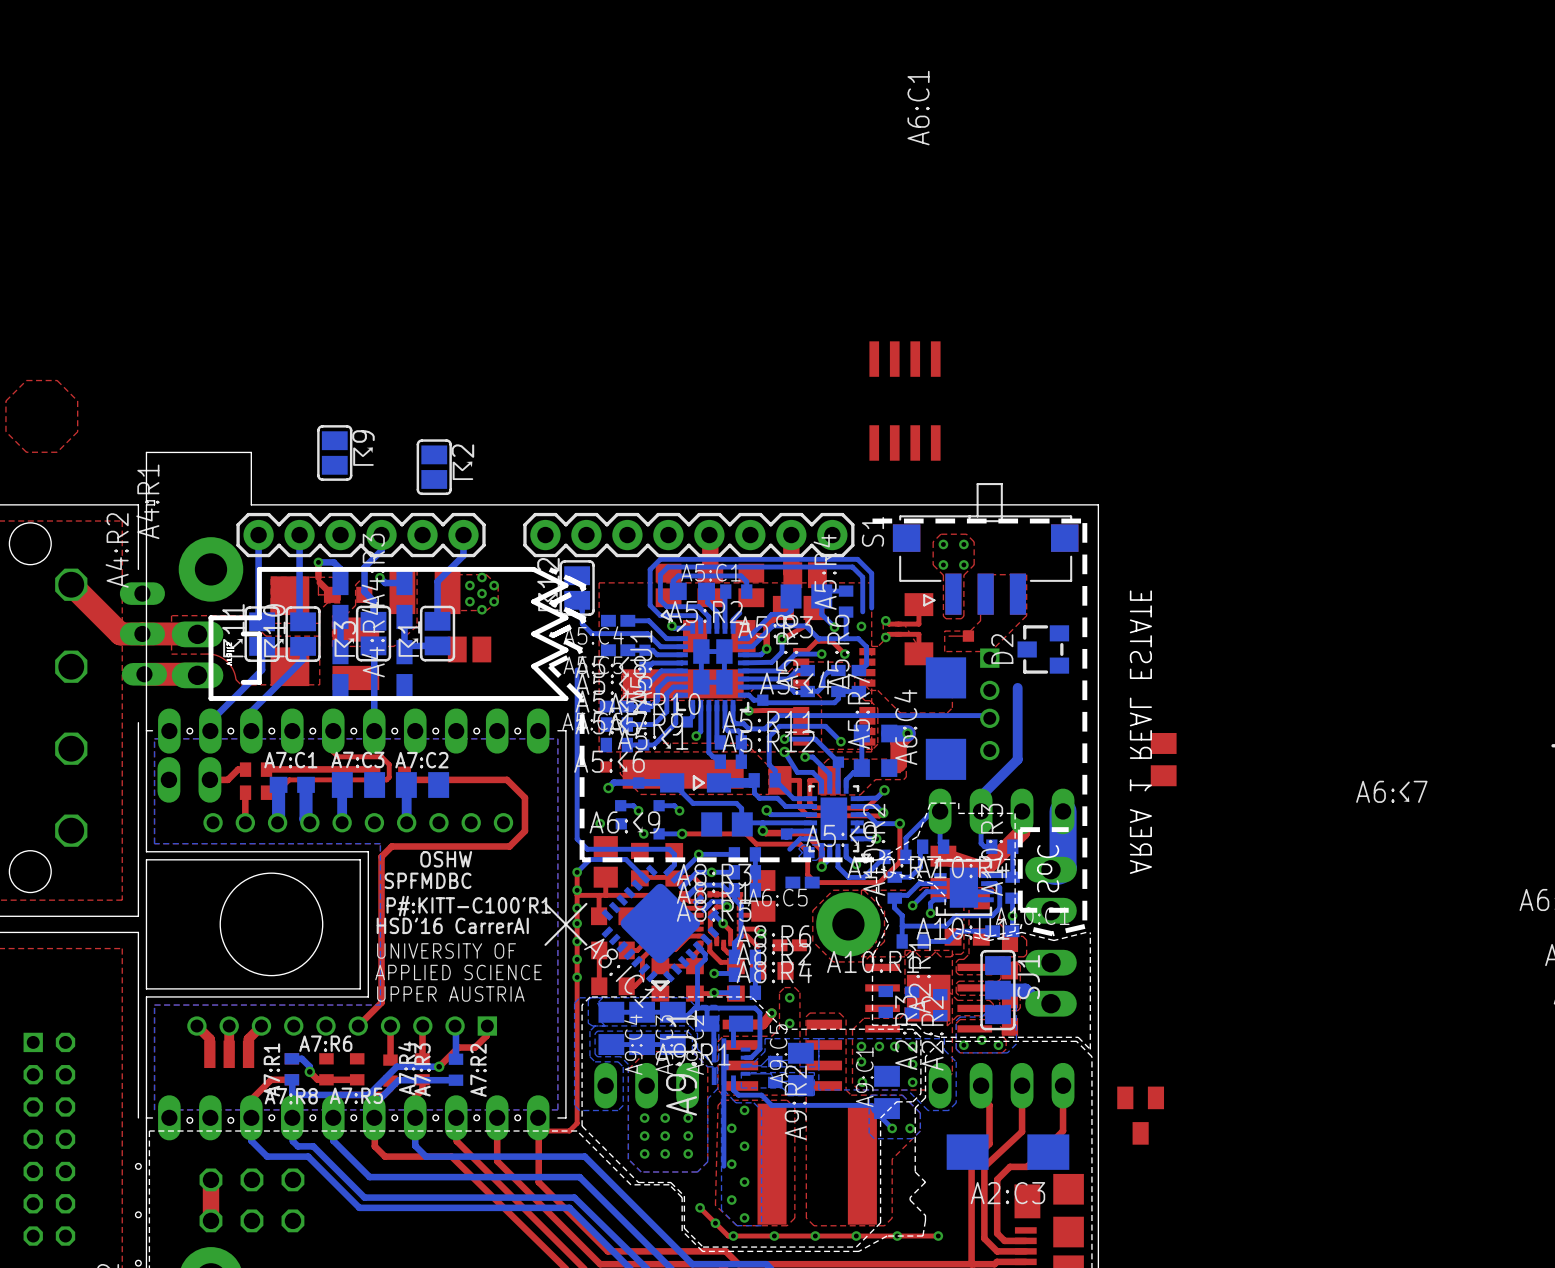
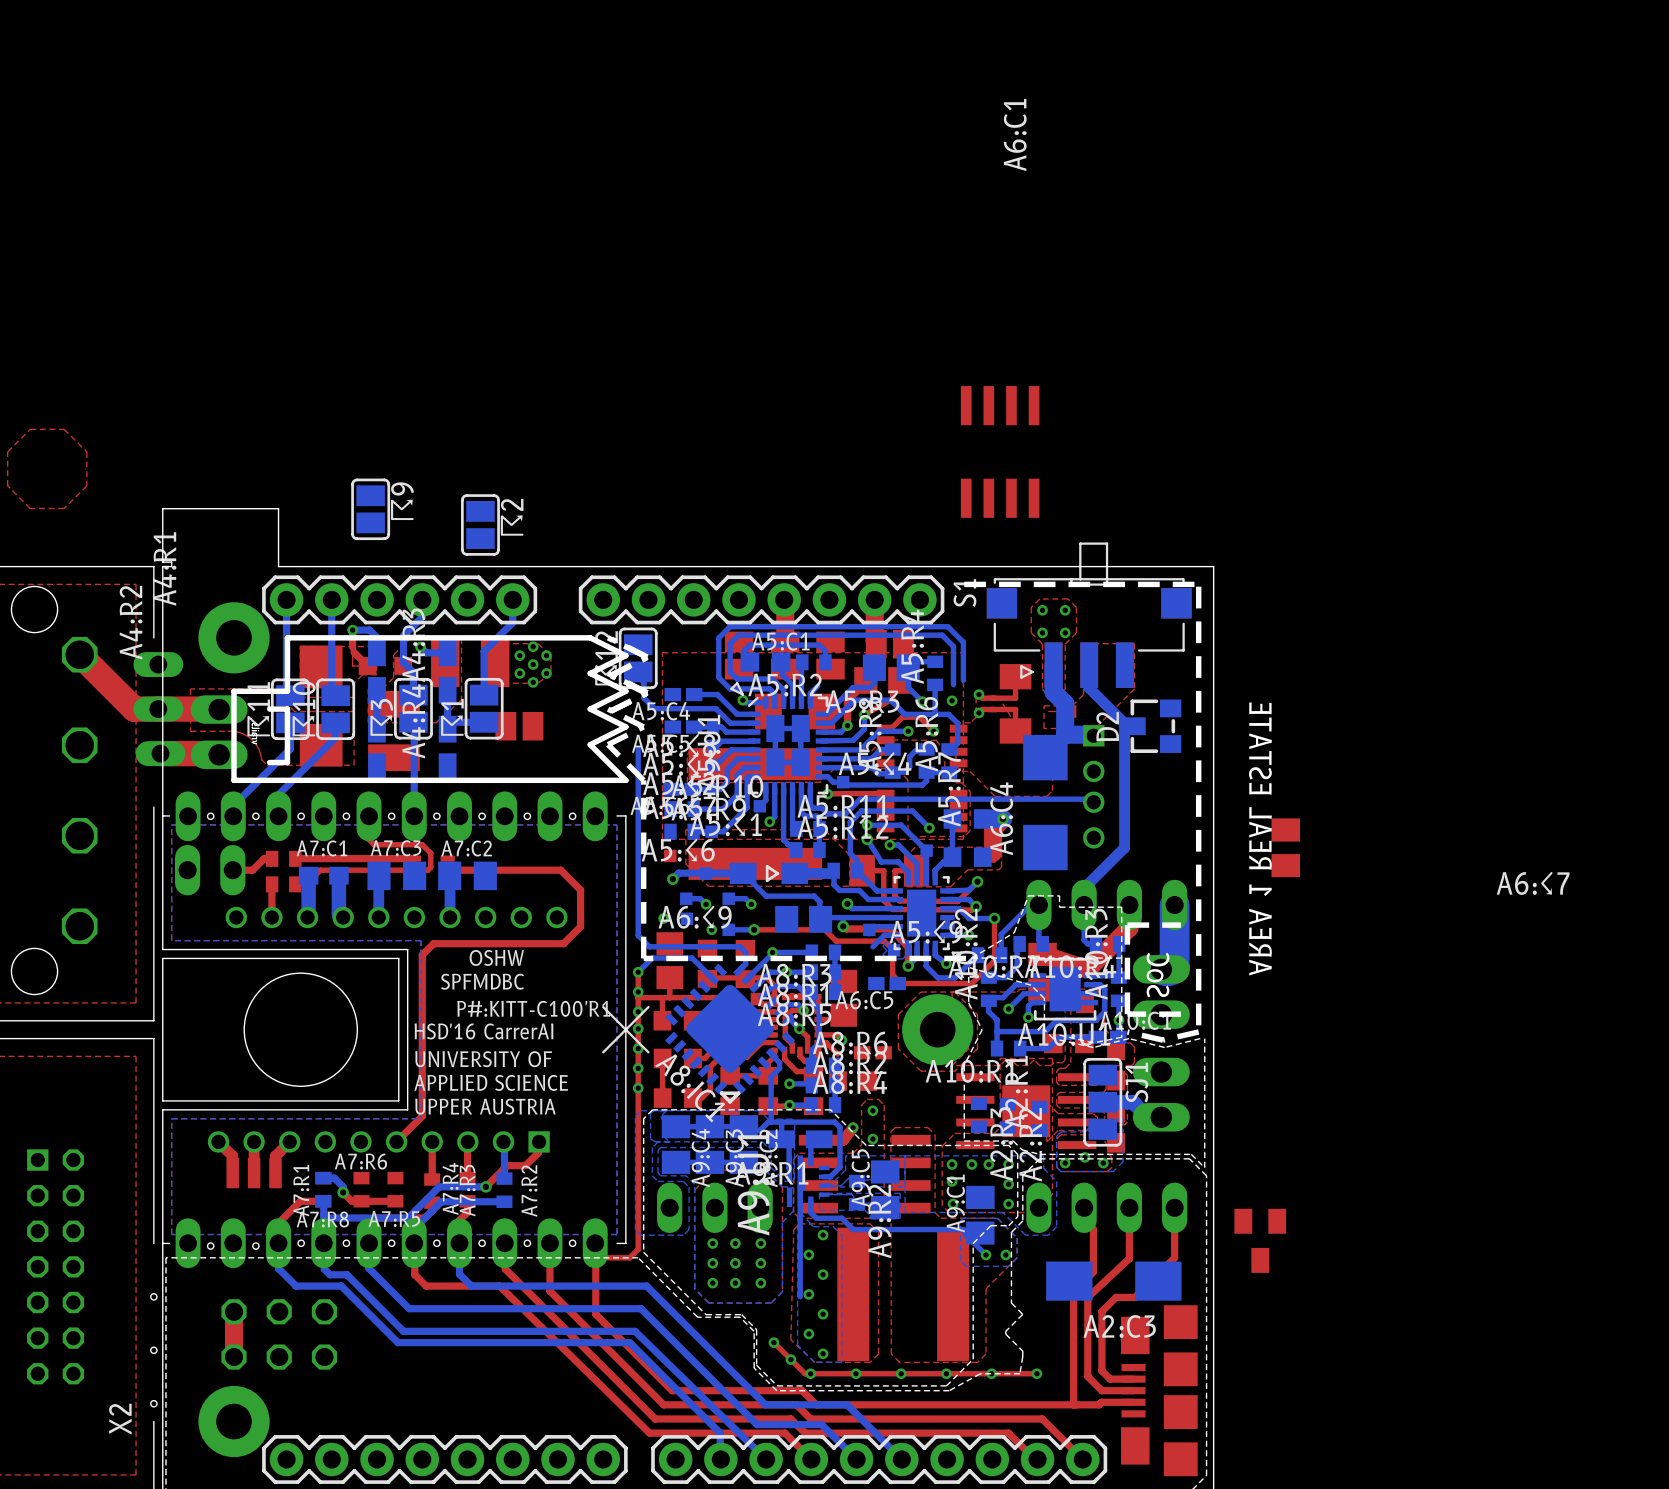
bottom track: none -> (1053, 665) (1053, 692) (1065, 703) (1065, 733) (1092, 734)
bottom track: none -> (1089, 665) (1089, 688) (1124, 723) (1124, 768)

